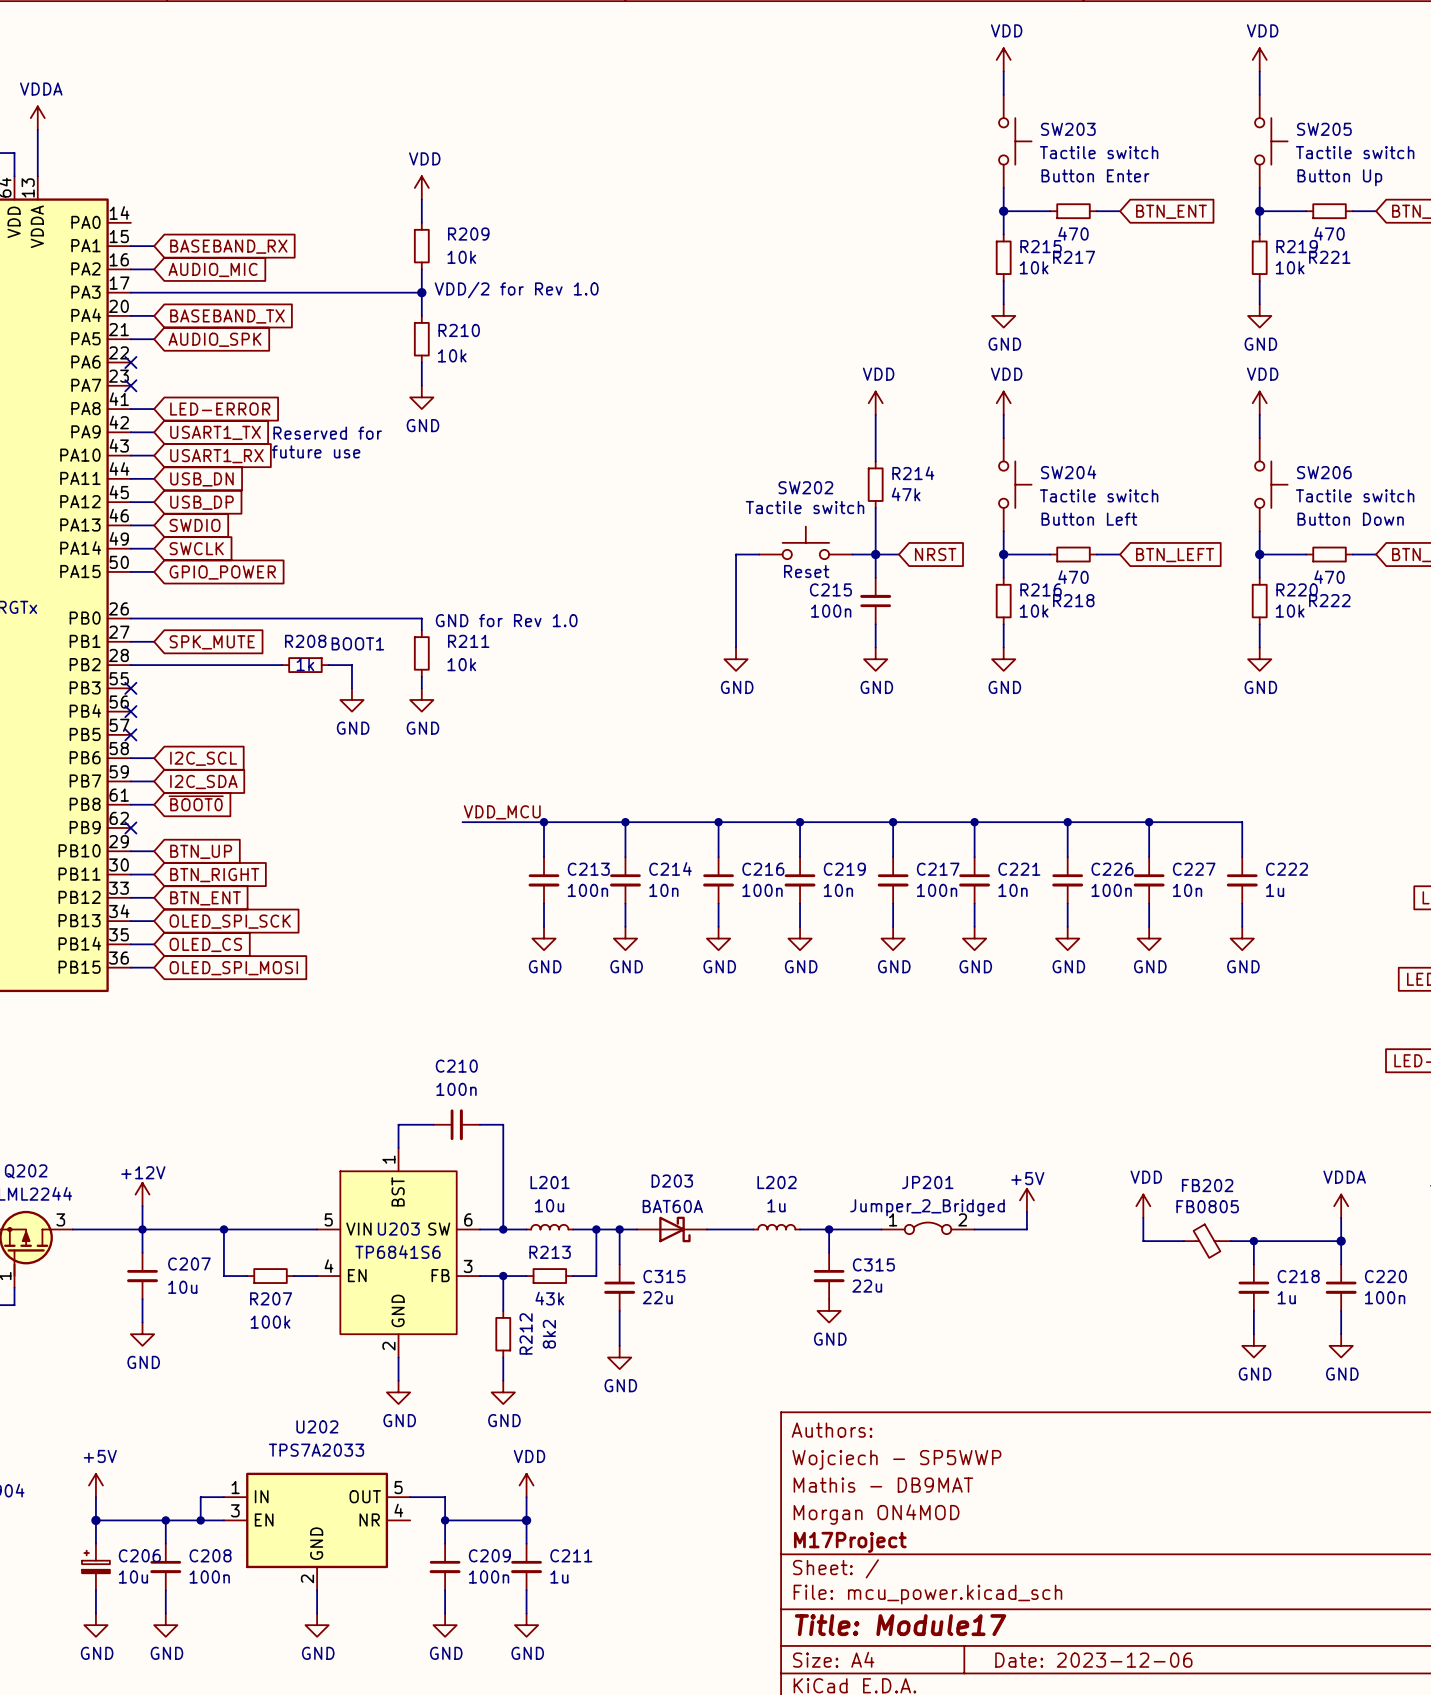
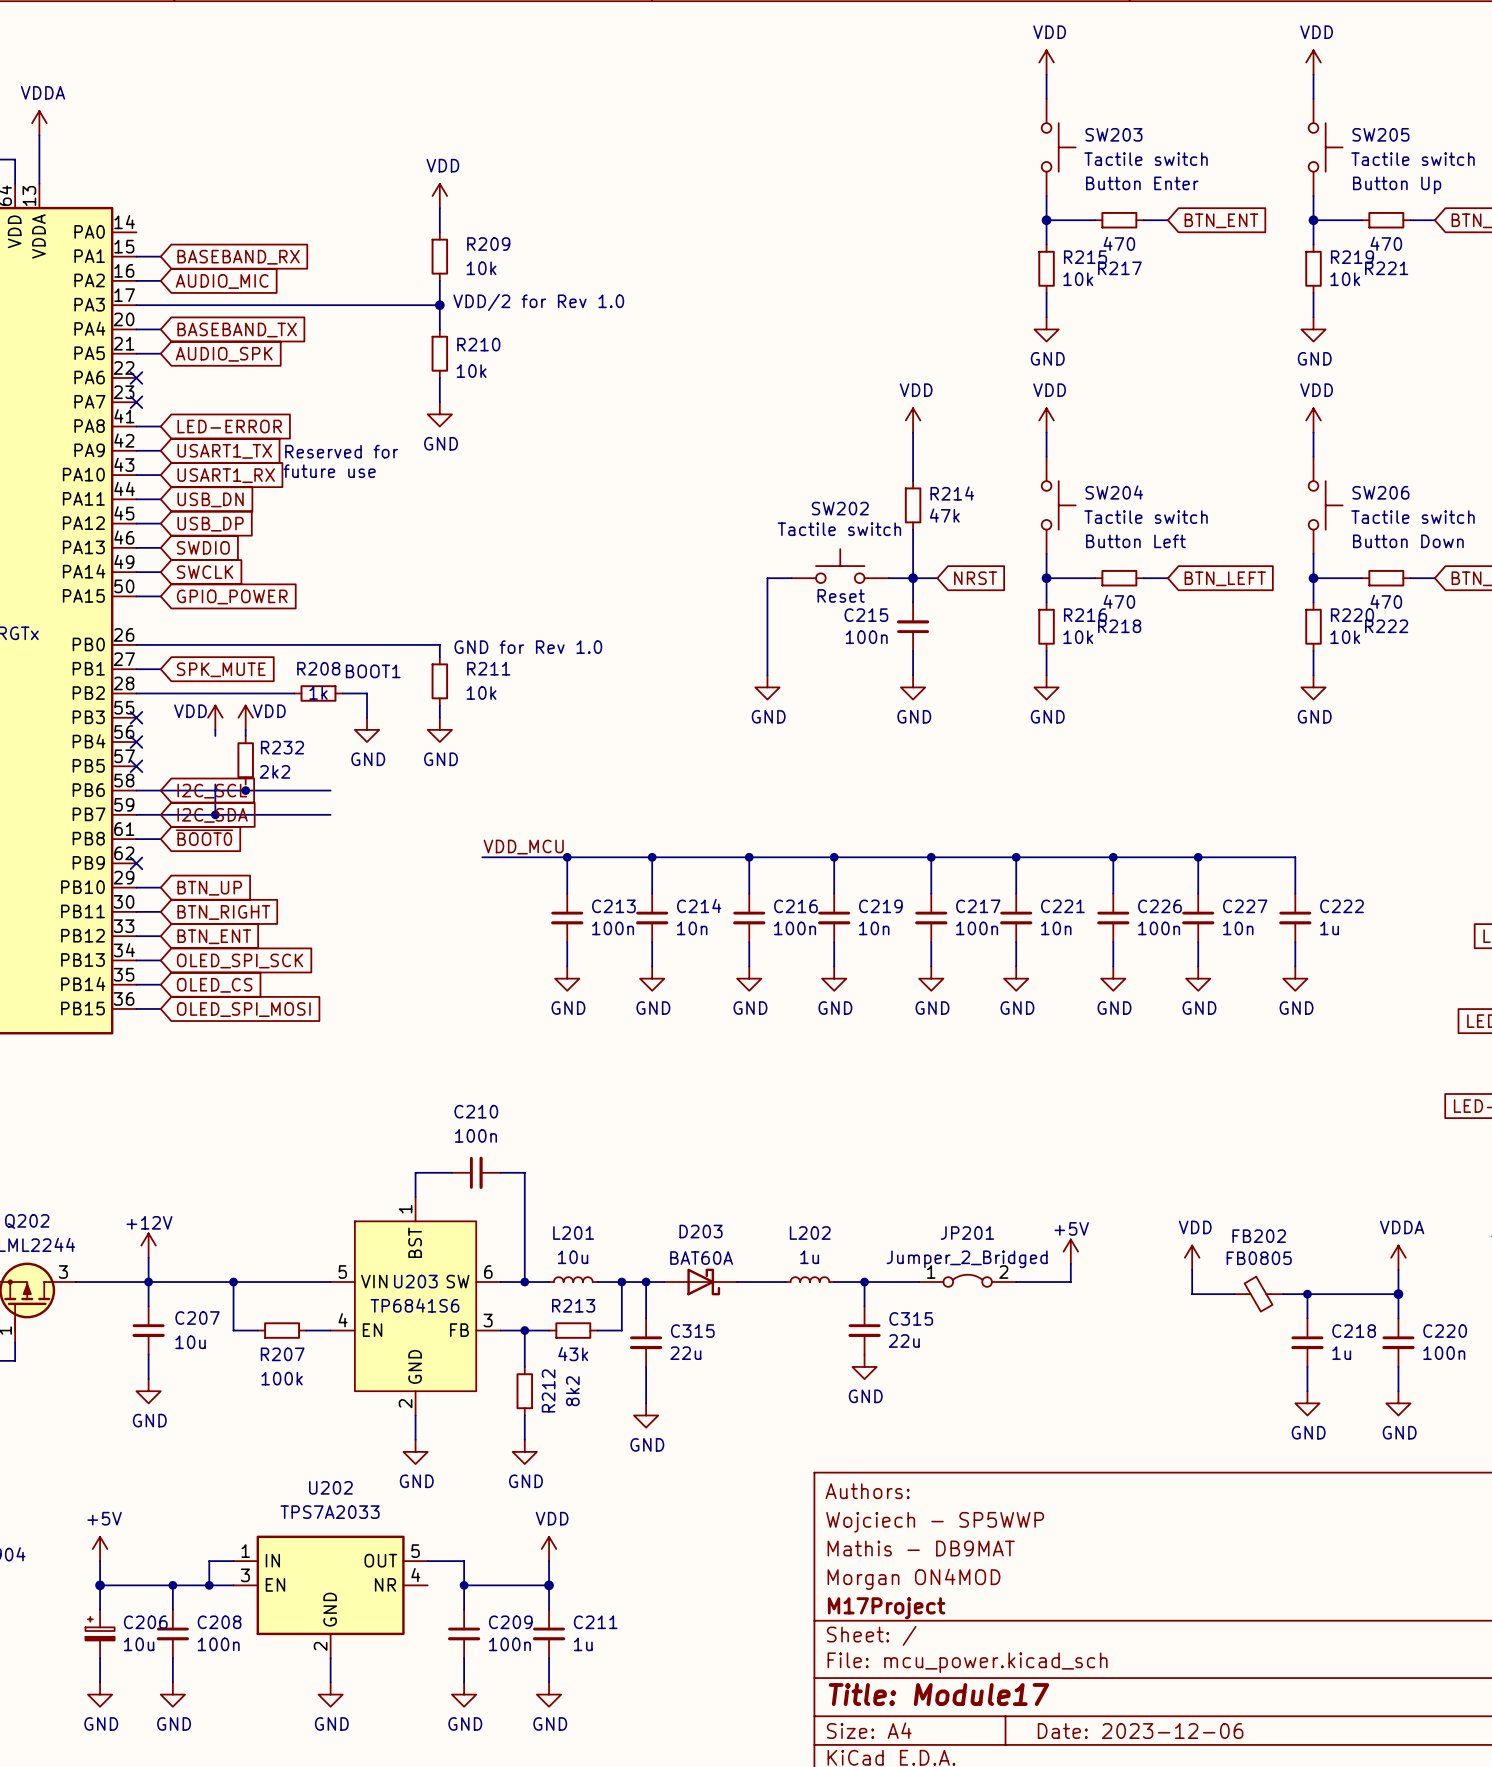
power symbol: none -> VDD (215, 717)
power symbol: none -> VDD (245, 717)
wire: none -> (215, 729) (215, 735)
wire: none -> (245, 729) (245, 735)
R232: none -> 2k2 (245, 760)
wire: none -> (215, 784) (215, 814)
wire: none -> (160, 790) (330, 790)
junction: none -> (245, 790)
wire: none -> (160, 814) (330, 814)
junction: none -> (215, 814)

